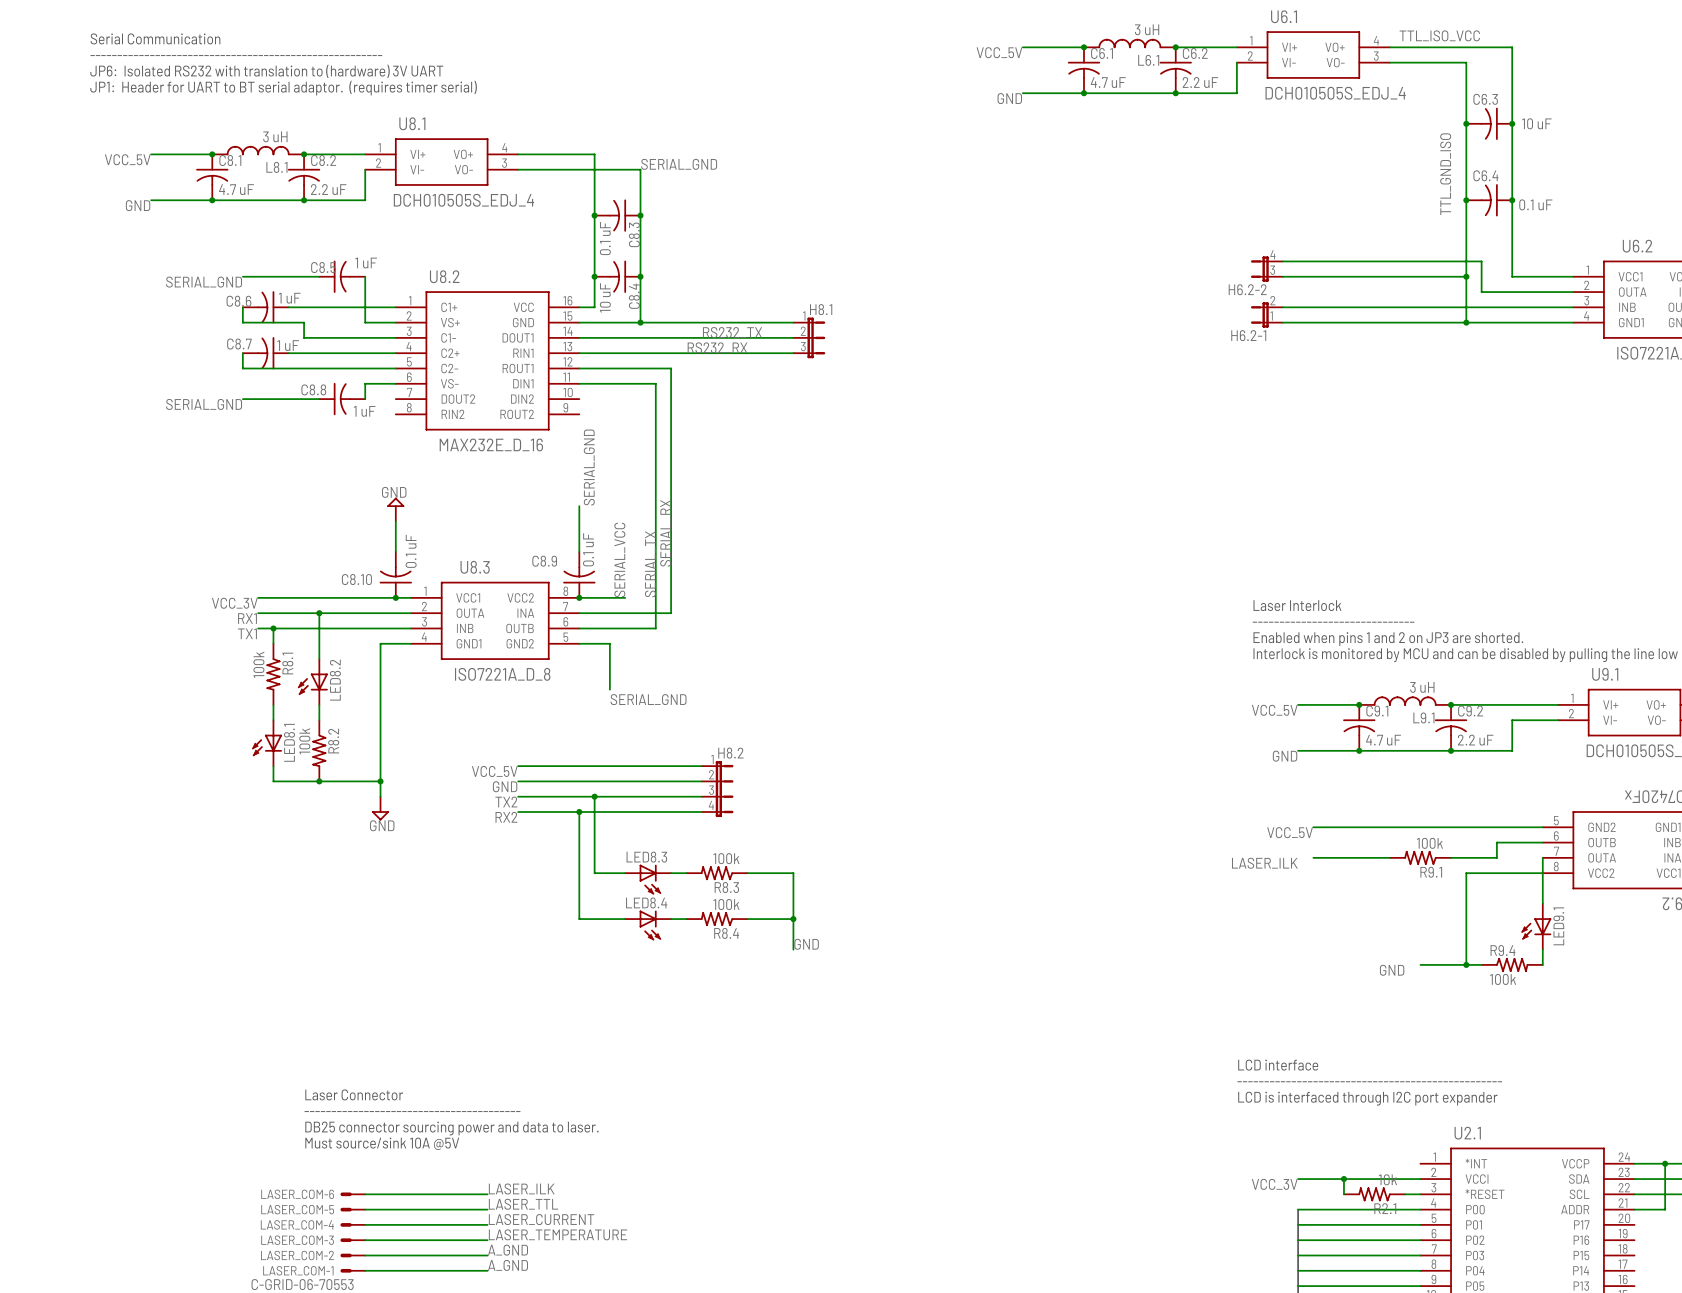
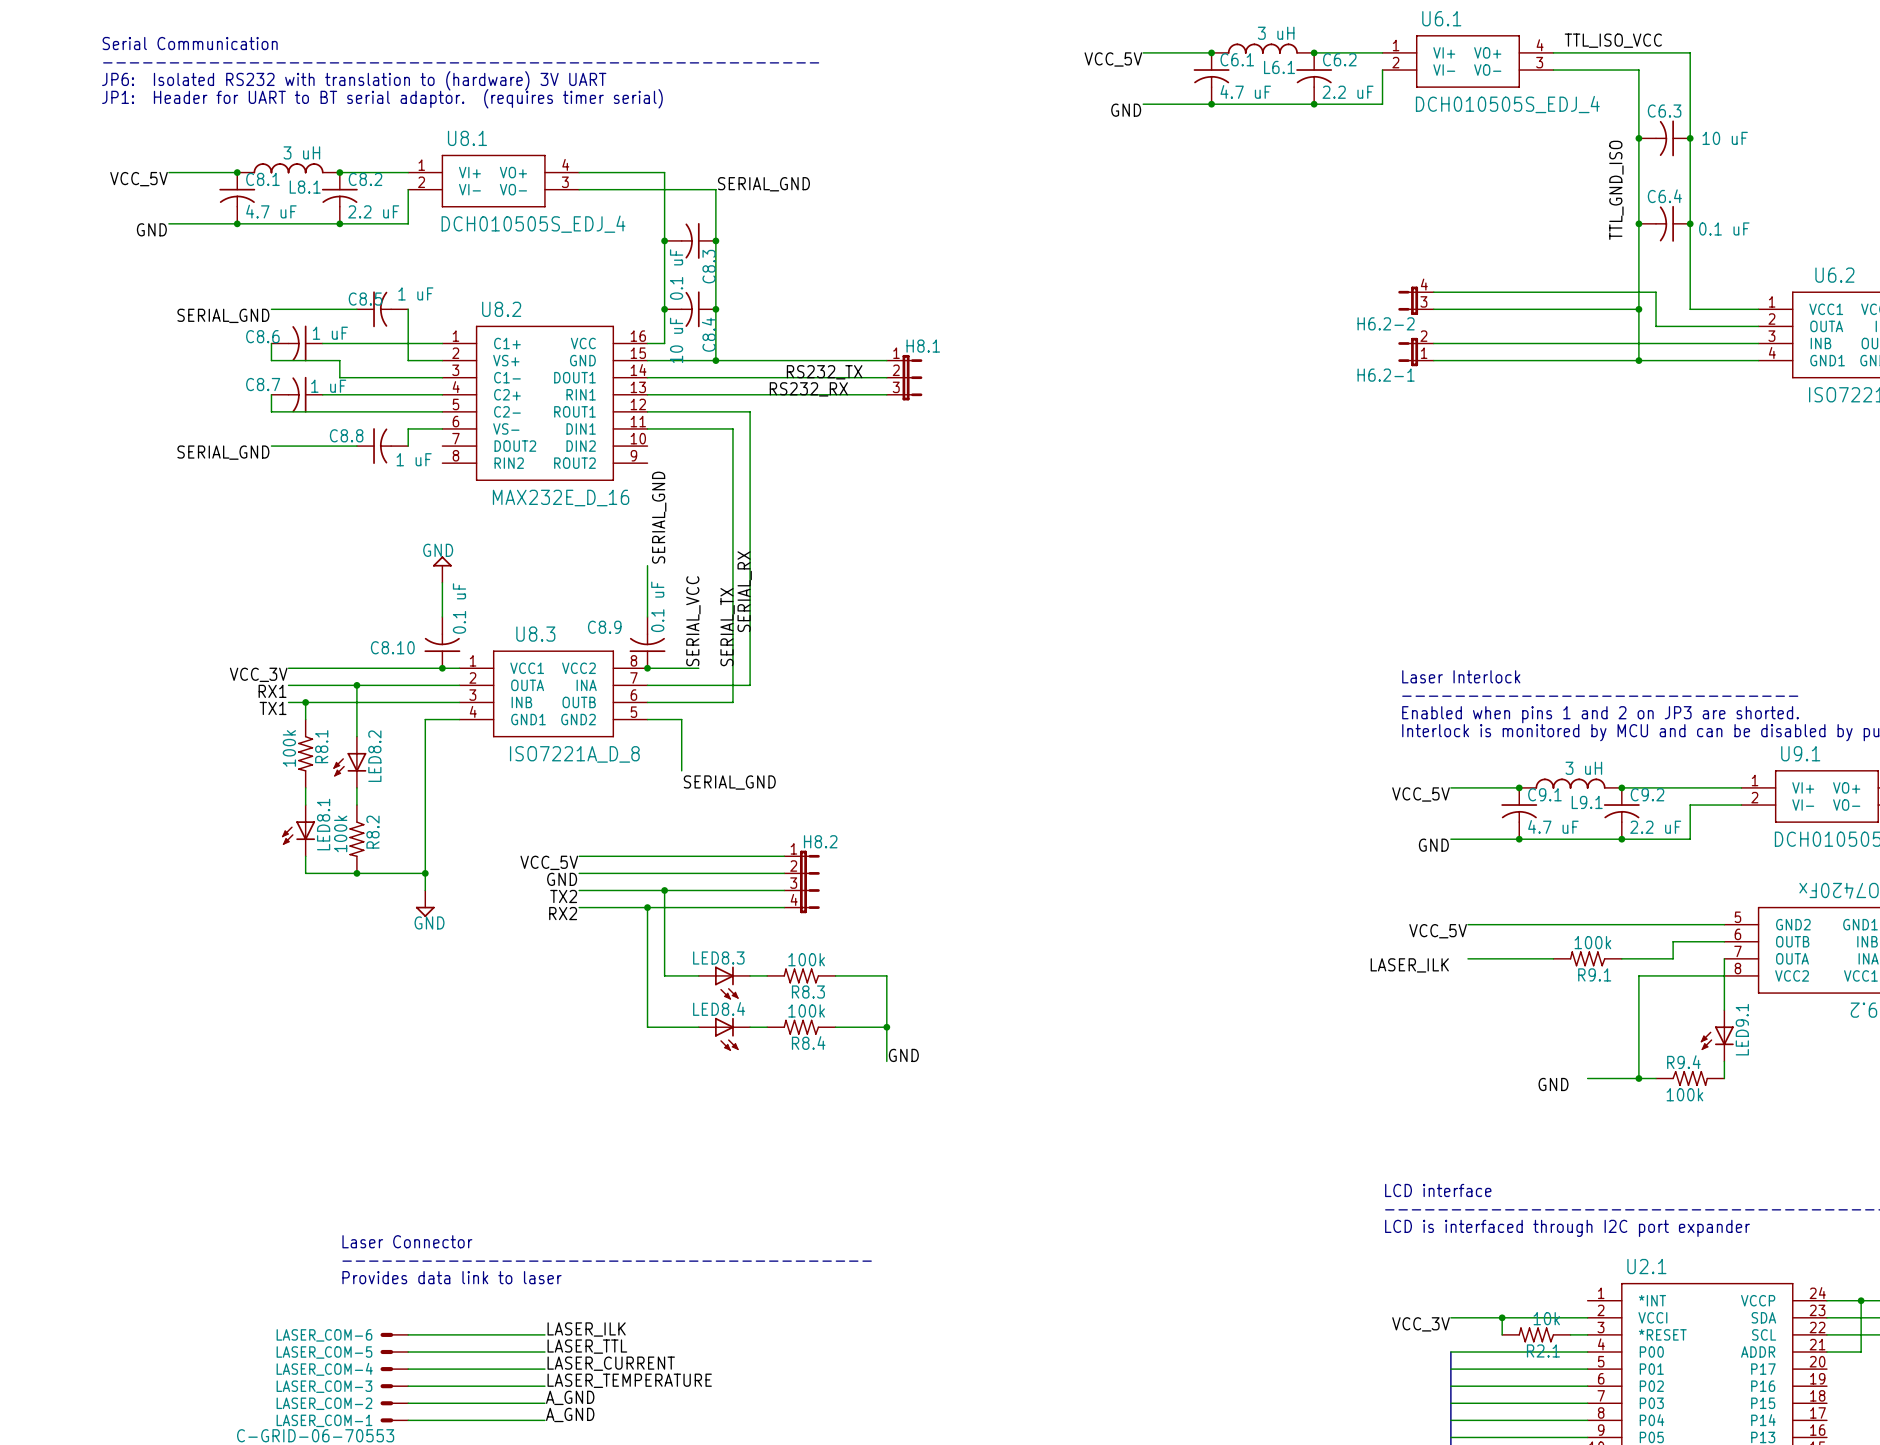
text: Laser Connector (354, 1094) -> none
text: ---------------------------------------- (412, 1111) -> Laser Connector (407, 1241)
text: DB25 connector sourcing power and data to laser. (451, 1128) -> ---------------------------------------- (607, 1261)
text: Must source/sink 10A @5V (382, 1143) -> Provides data link to laser (452, 1277)

